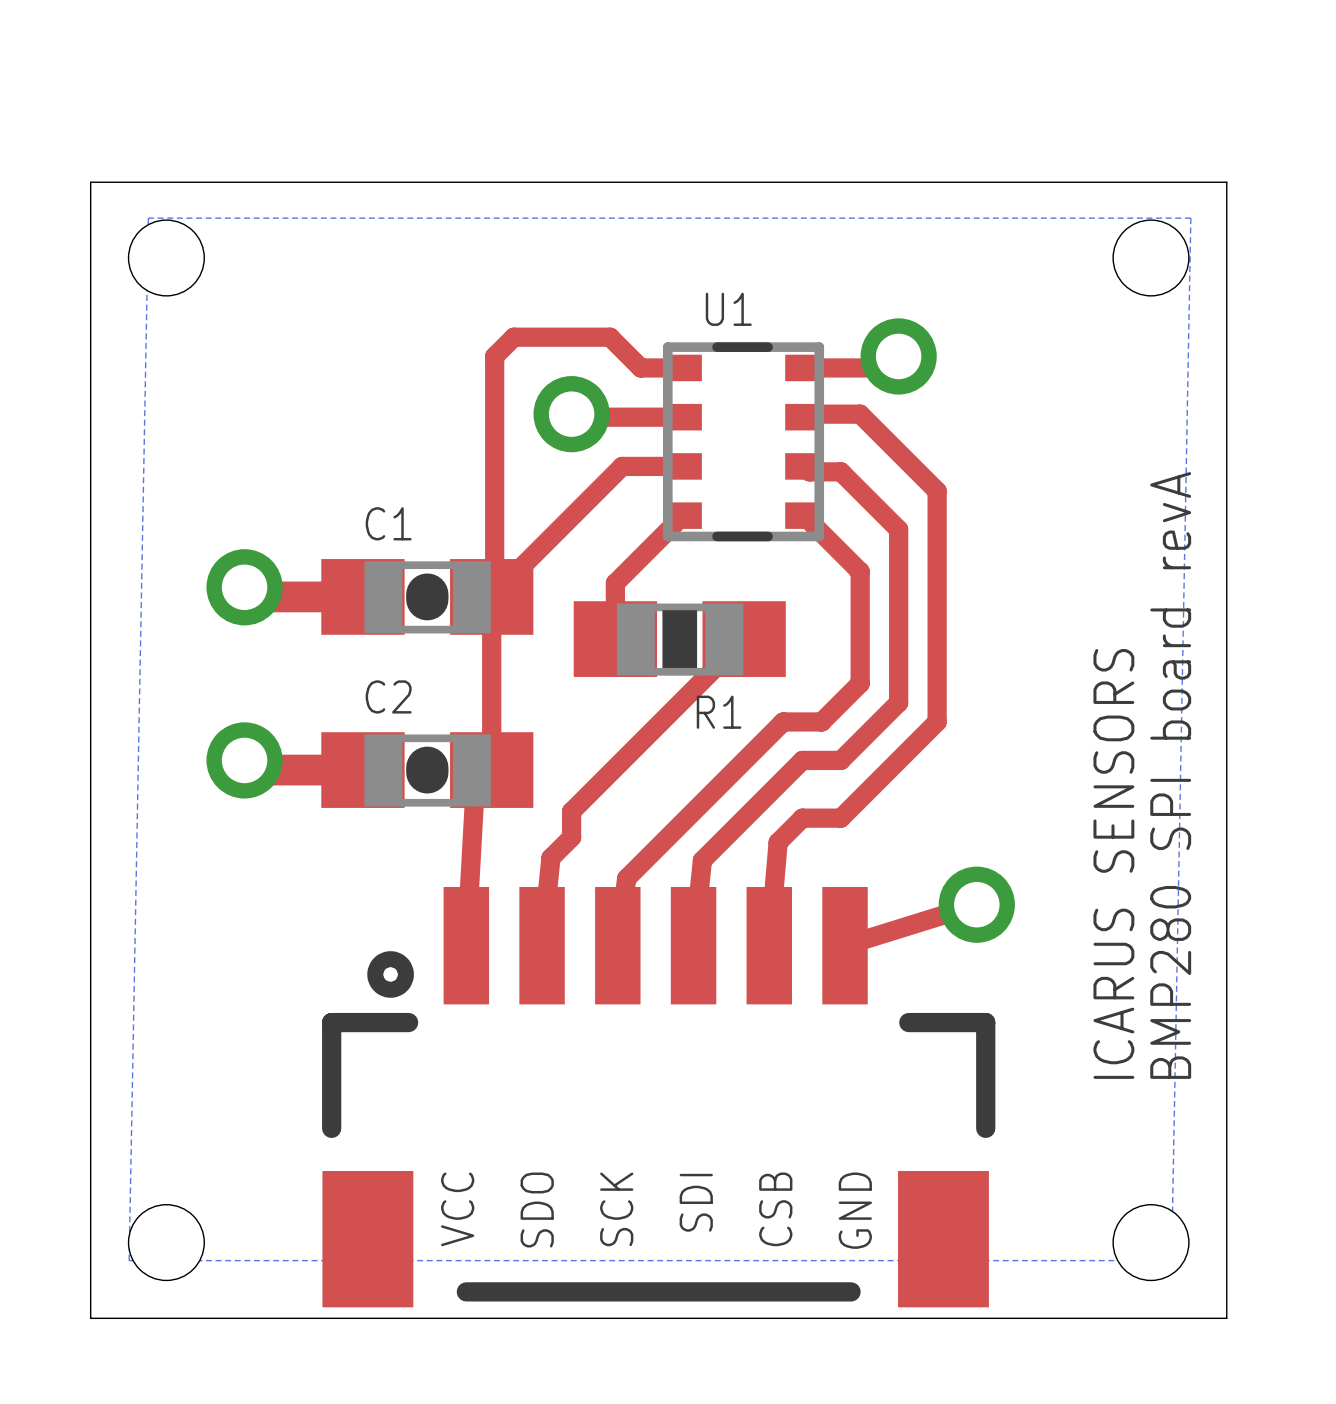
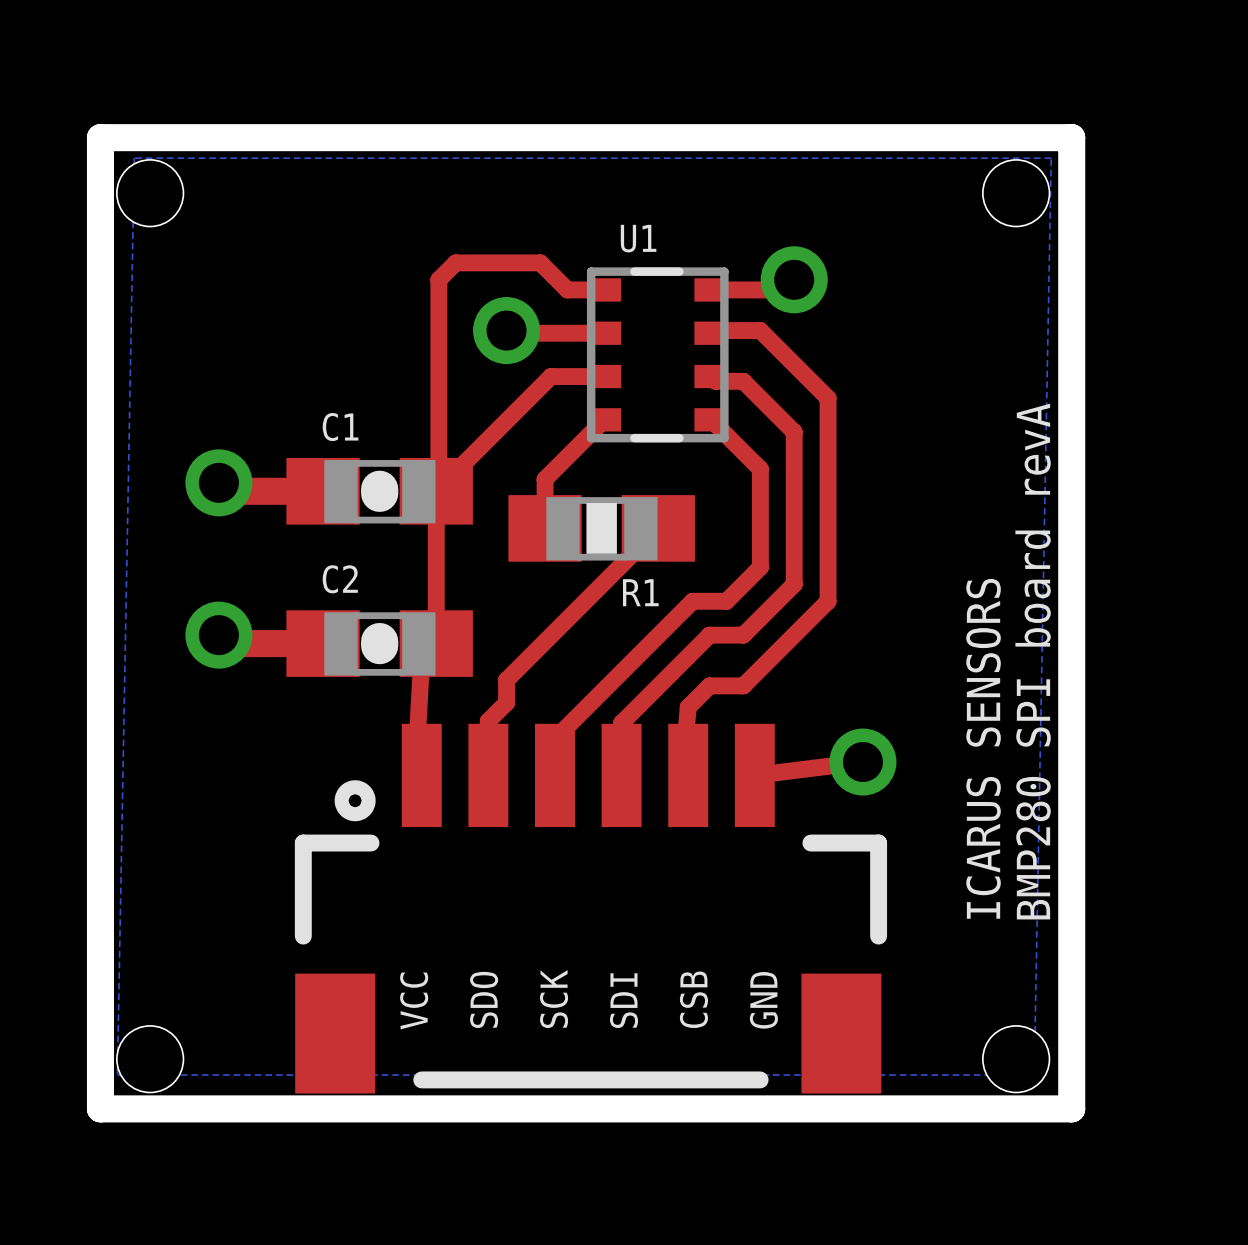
board edge: (90, 182) (90, 1318) (1226, 1318) (1226, 182) (90, 182) -> (100, 137) (100, 1108) (1071, 1108) (1071, 137) (100, 137)
top track: (976, 904) (845, 945) -> (862, 762) (754, 775)
part position: (658, 1097) -> (590, 908)

